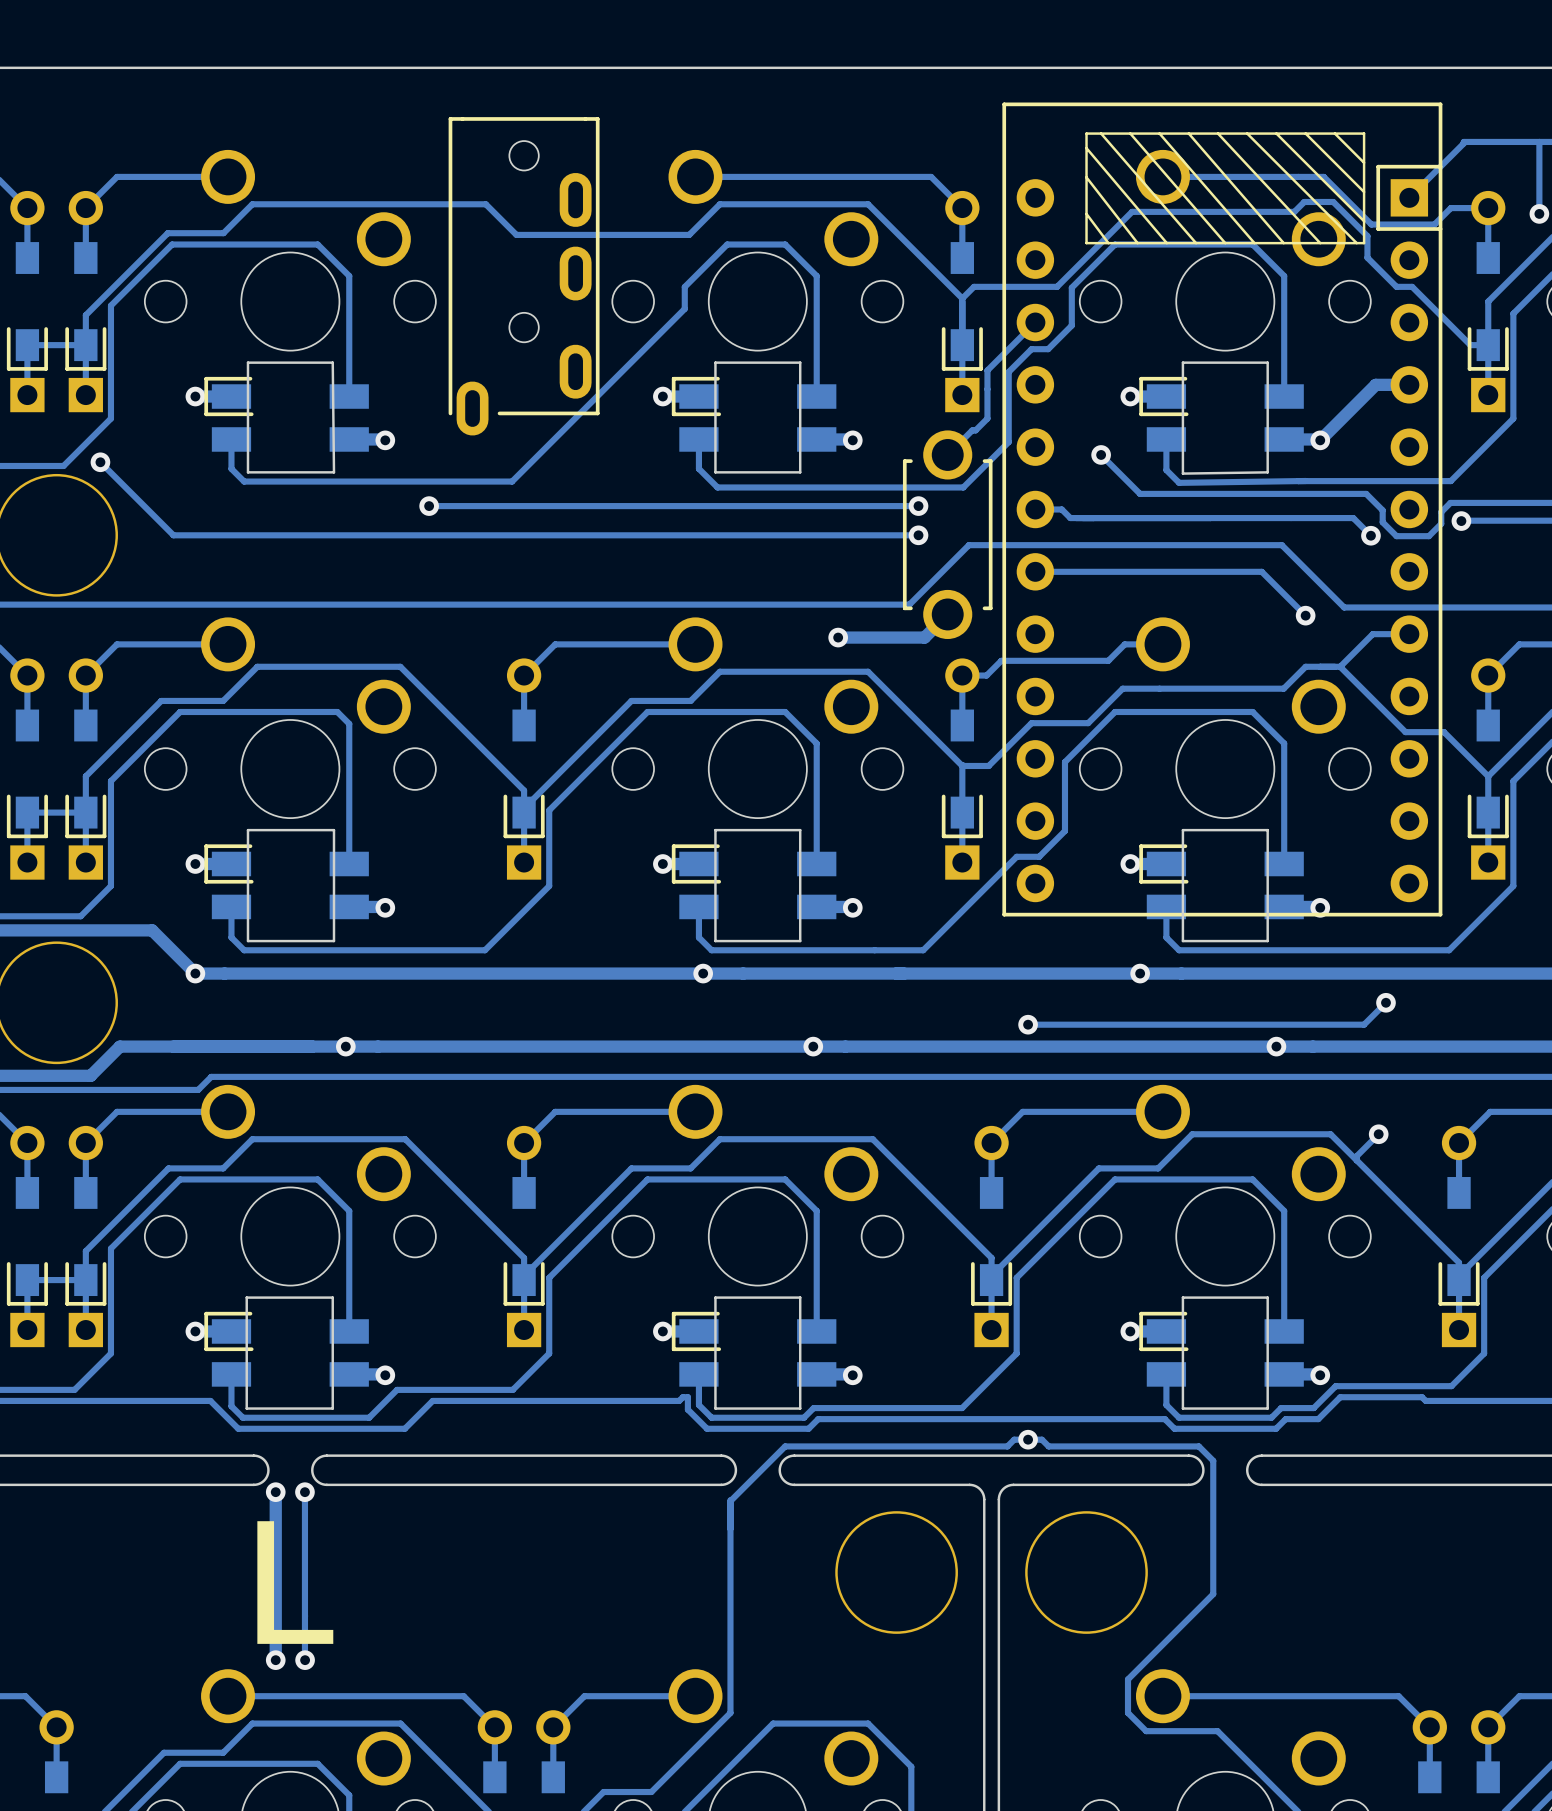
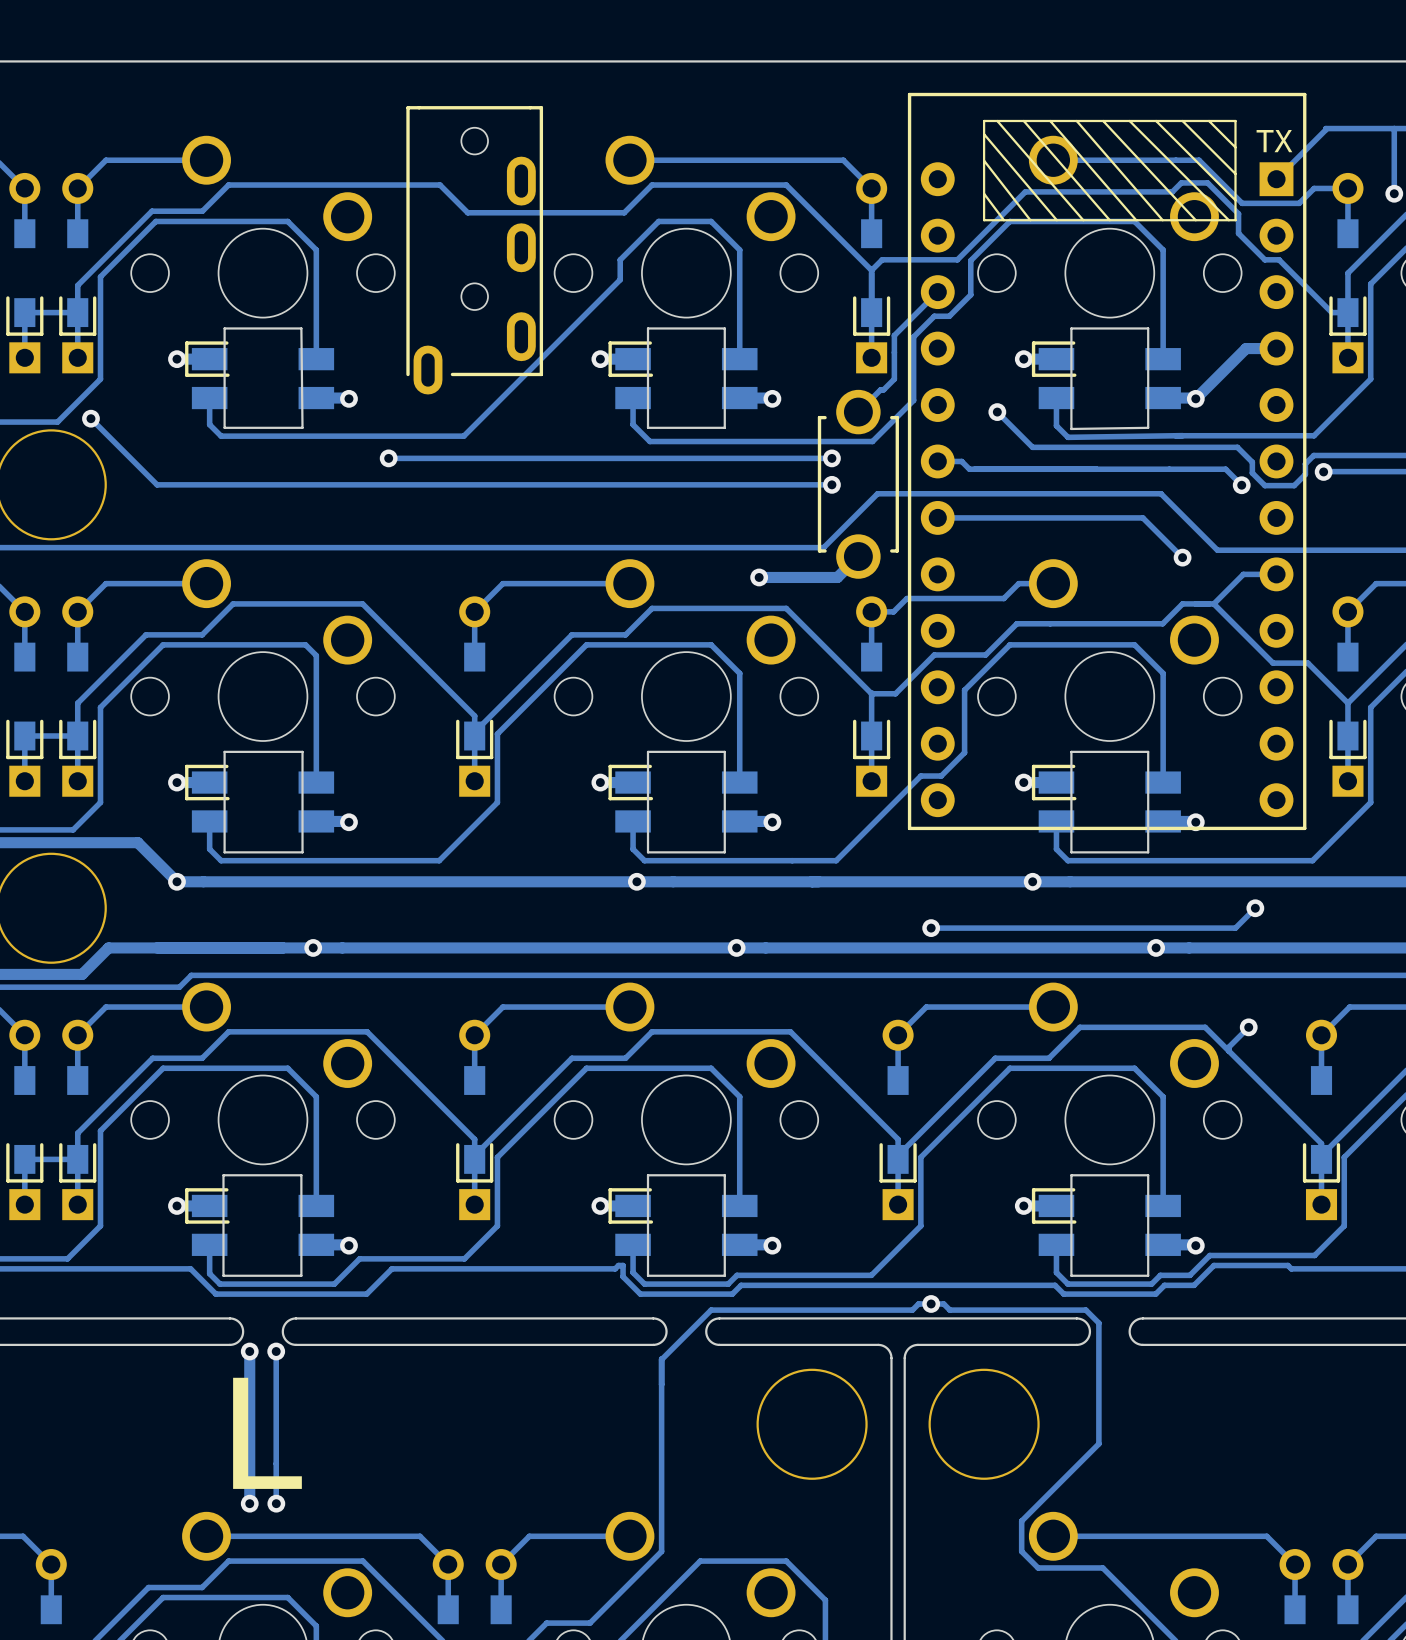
part footprint: [1002, 102, 1443, 917] -> [907, 92, 1307, 831]

